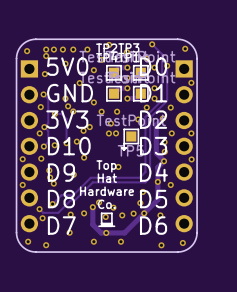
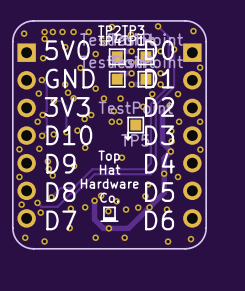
via: none -> (21, 204)

